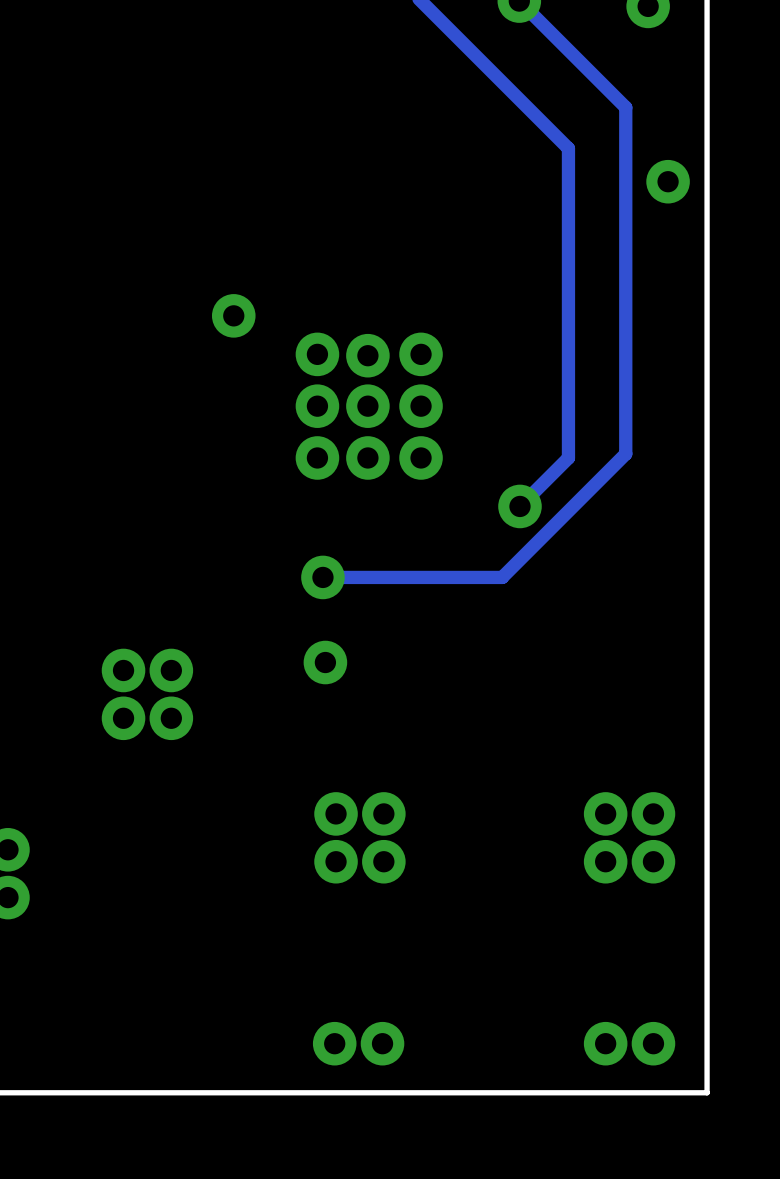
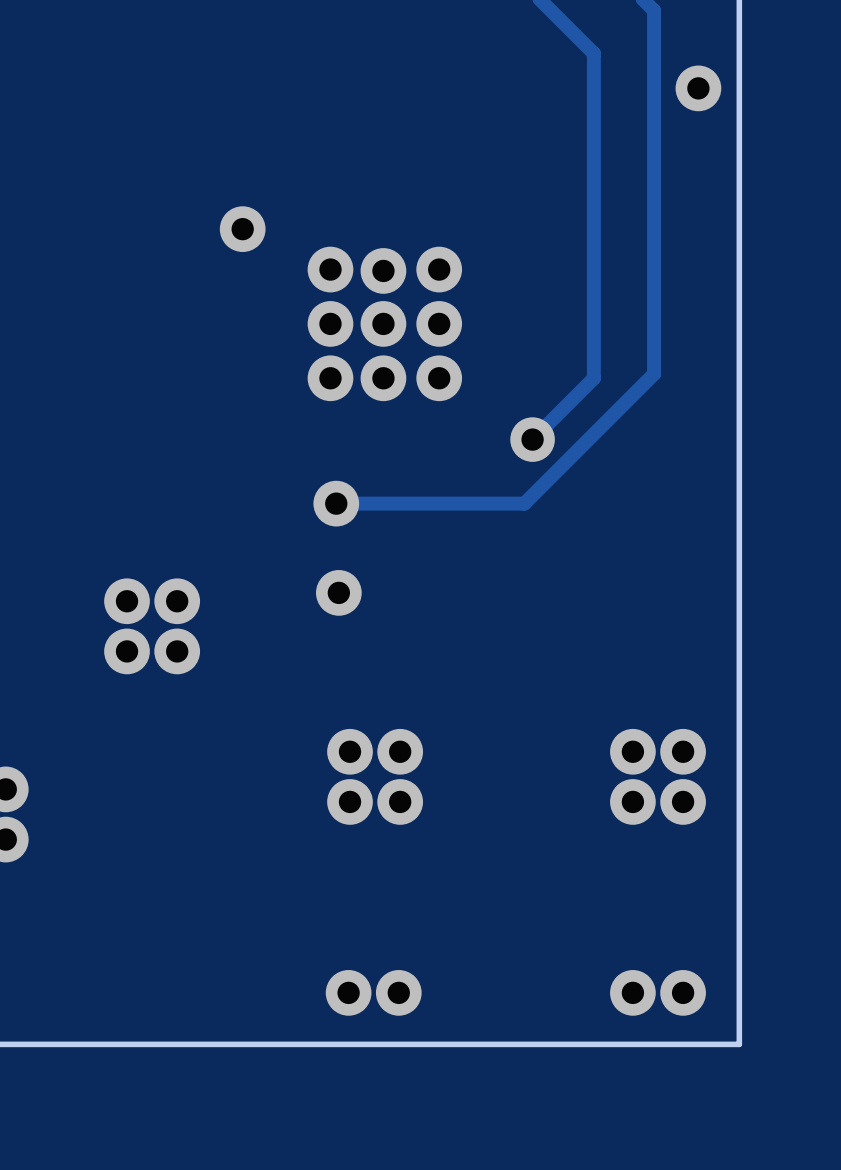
via position: (519, 506) -> (532, 439)

